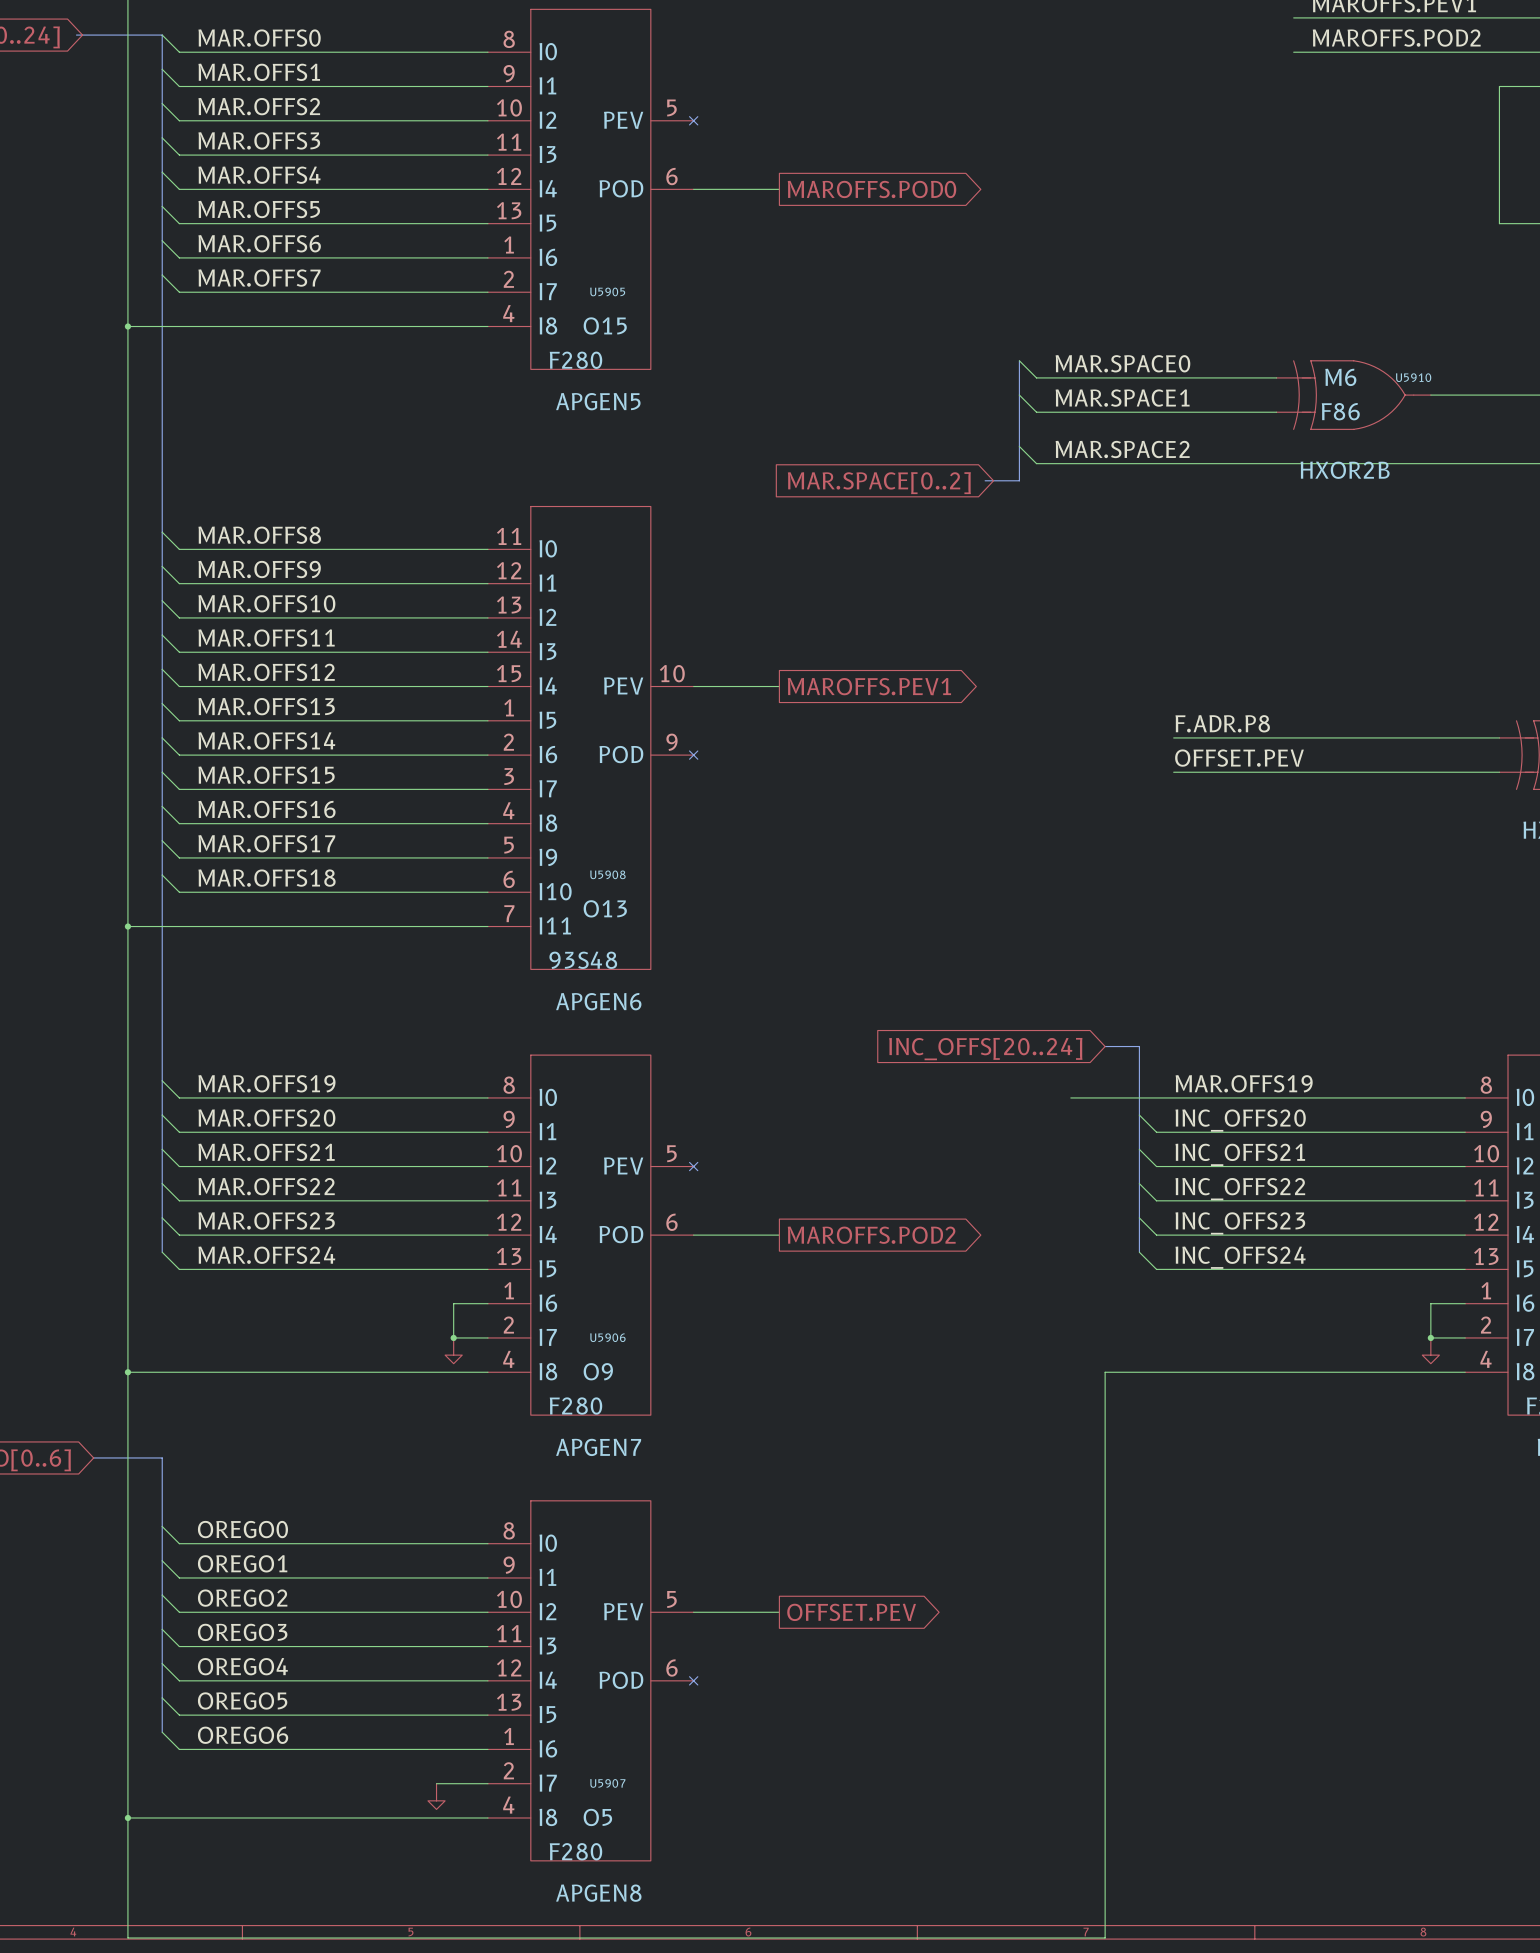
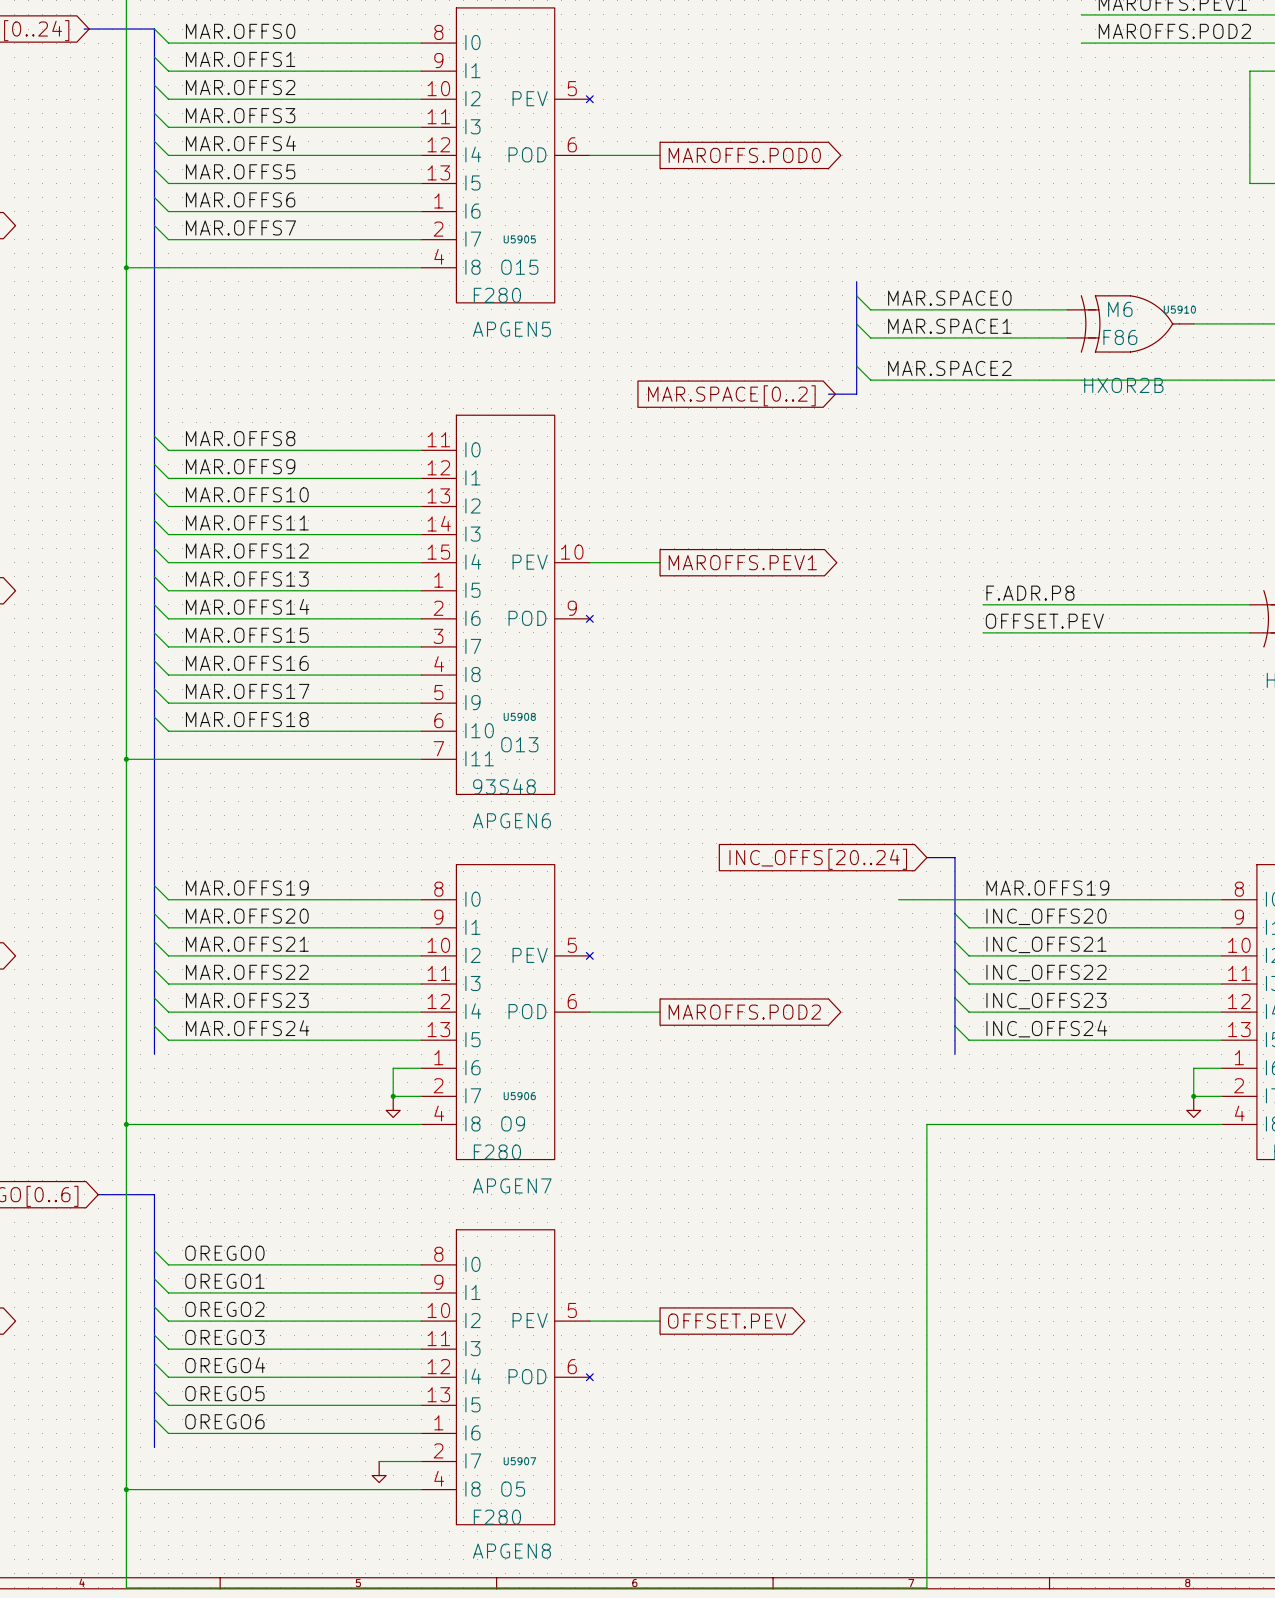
bus: none -> (856, 281) (856, 295)
bus: none -> (154, 1026) (154, 1054)
bus: none -> (954, 1026) (954, 1054)
bus: none -> (154, 1419) (154, 1447)

